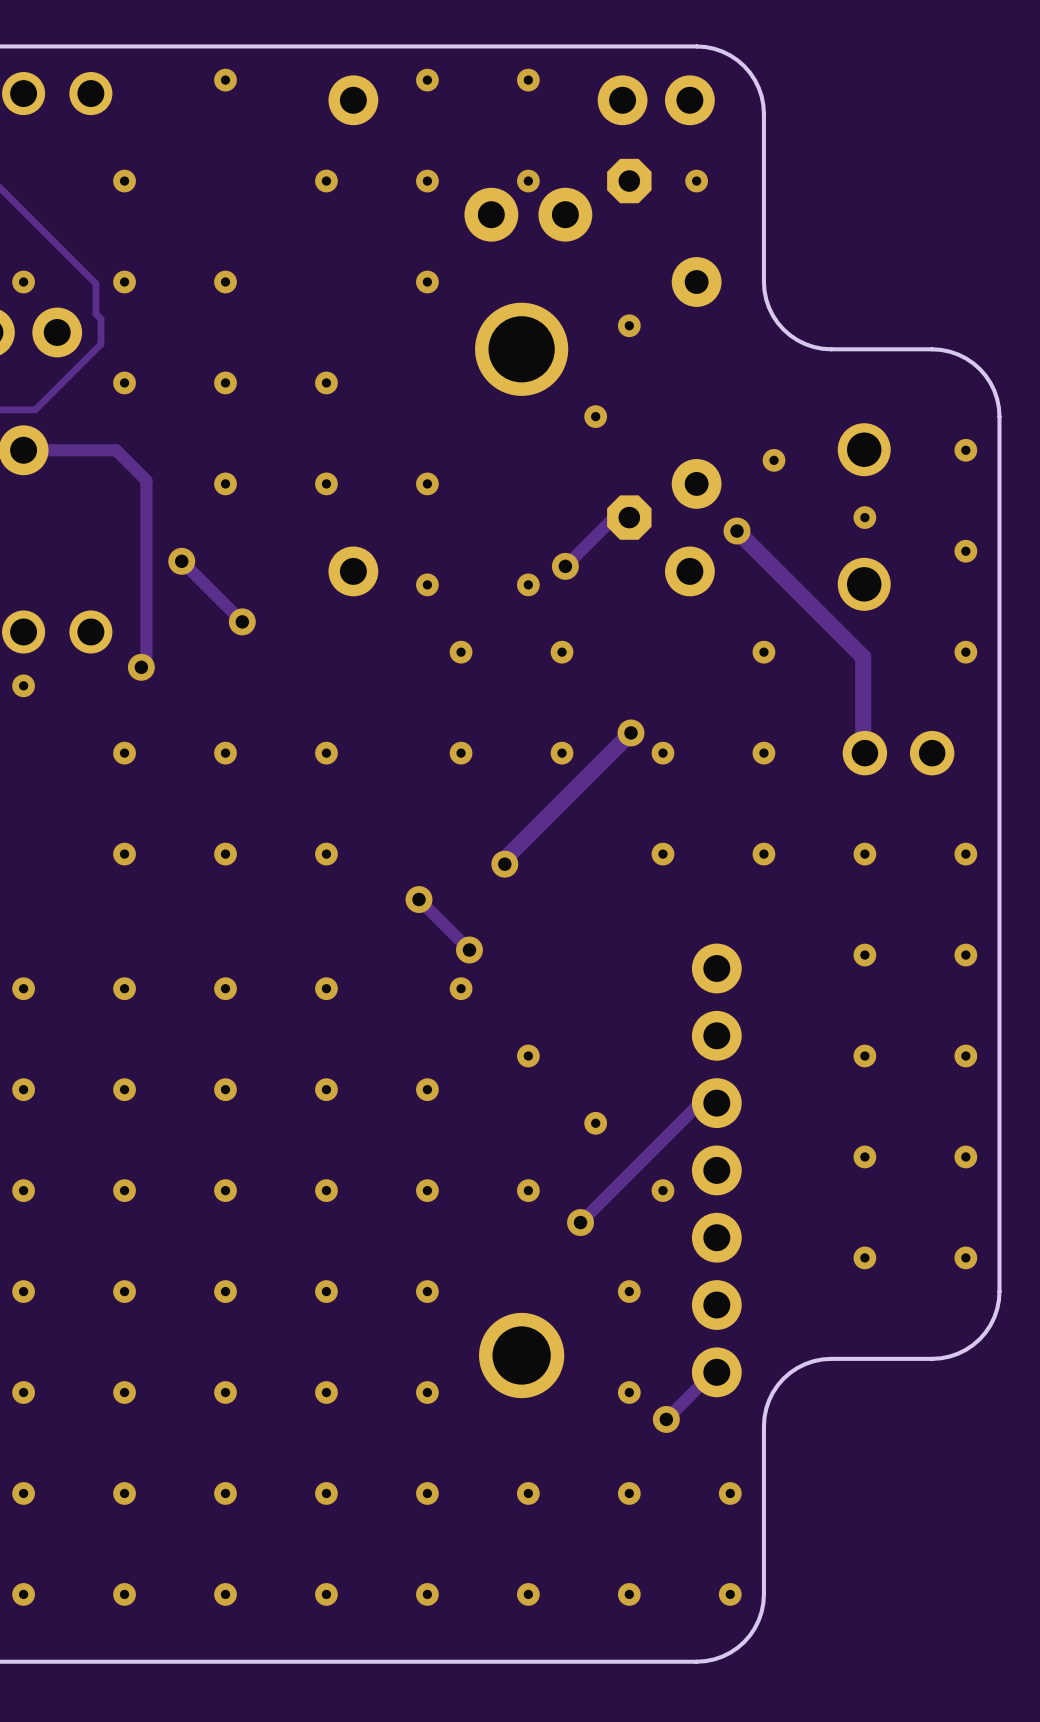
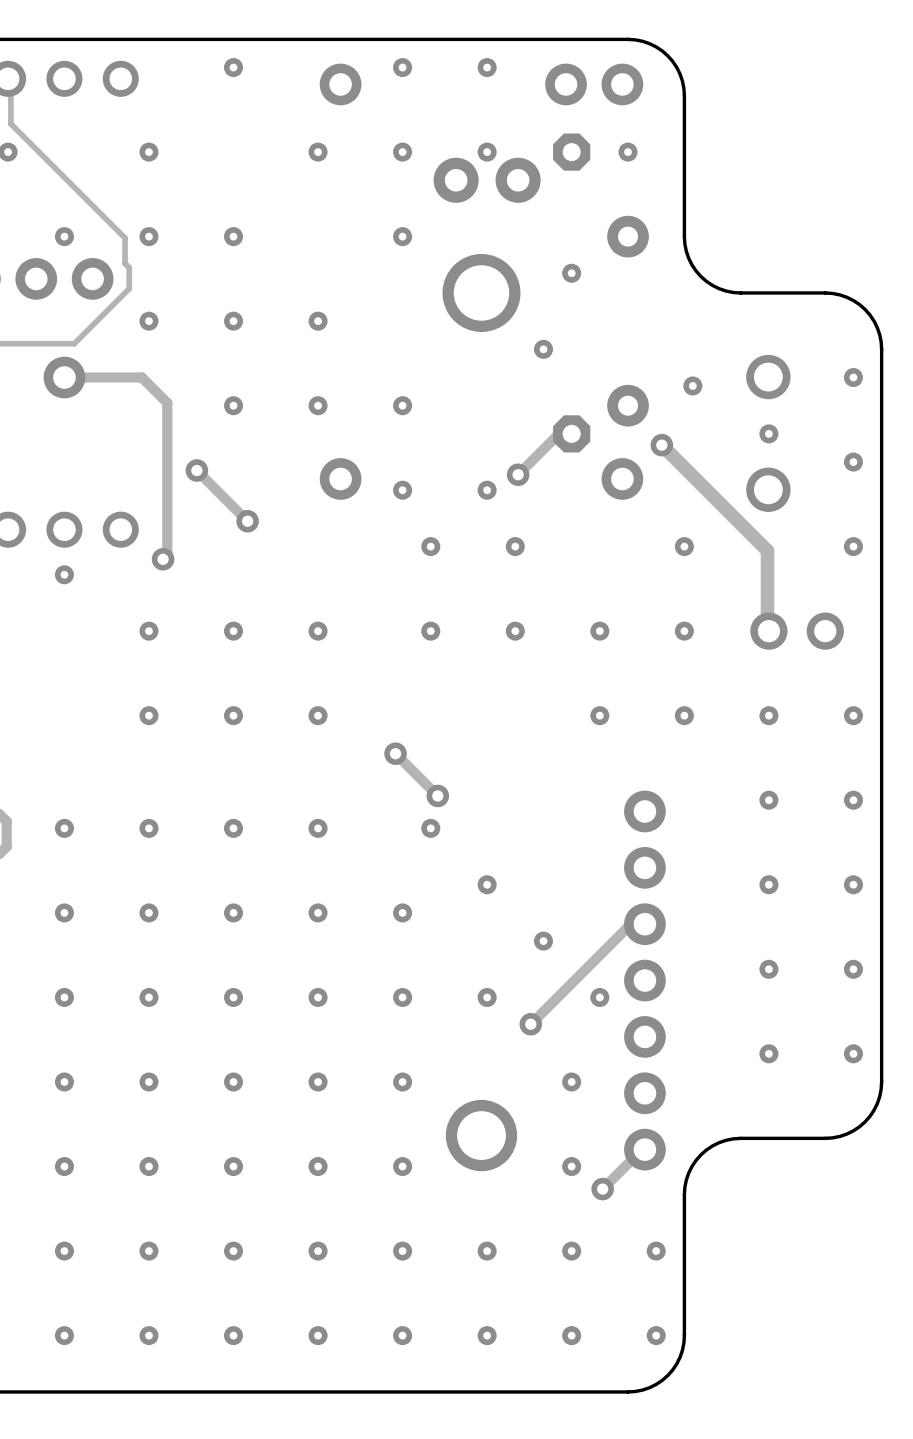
track: (631, 732) (504, 859) (504, 864) -> none
via: (631, 732) -> none
via: (504, 864) -> none

